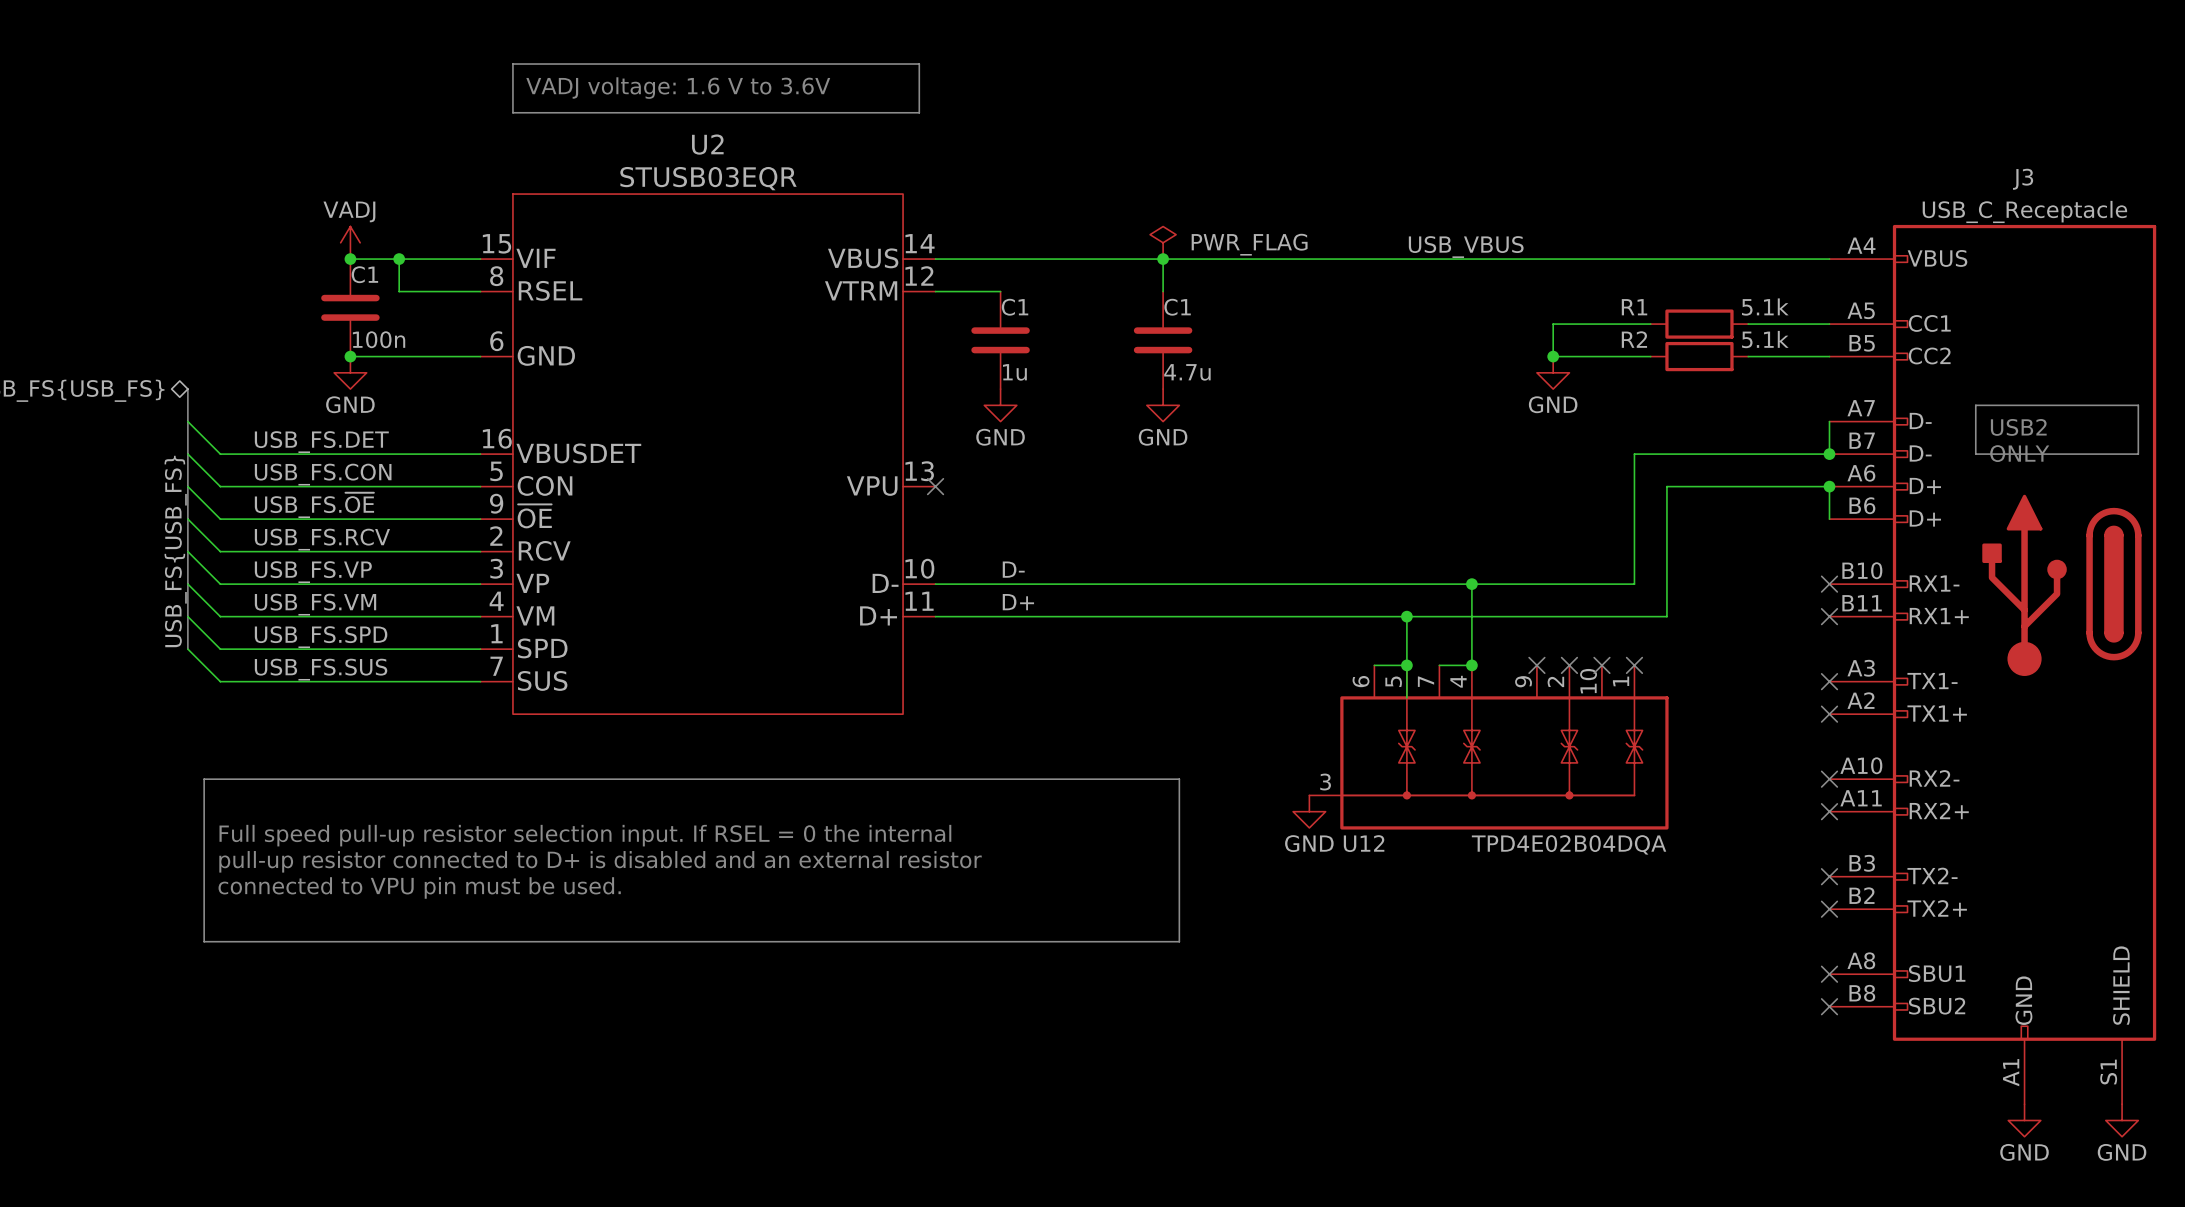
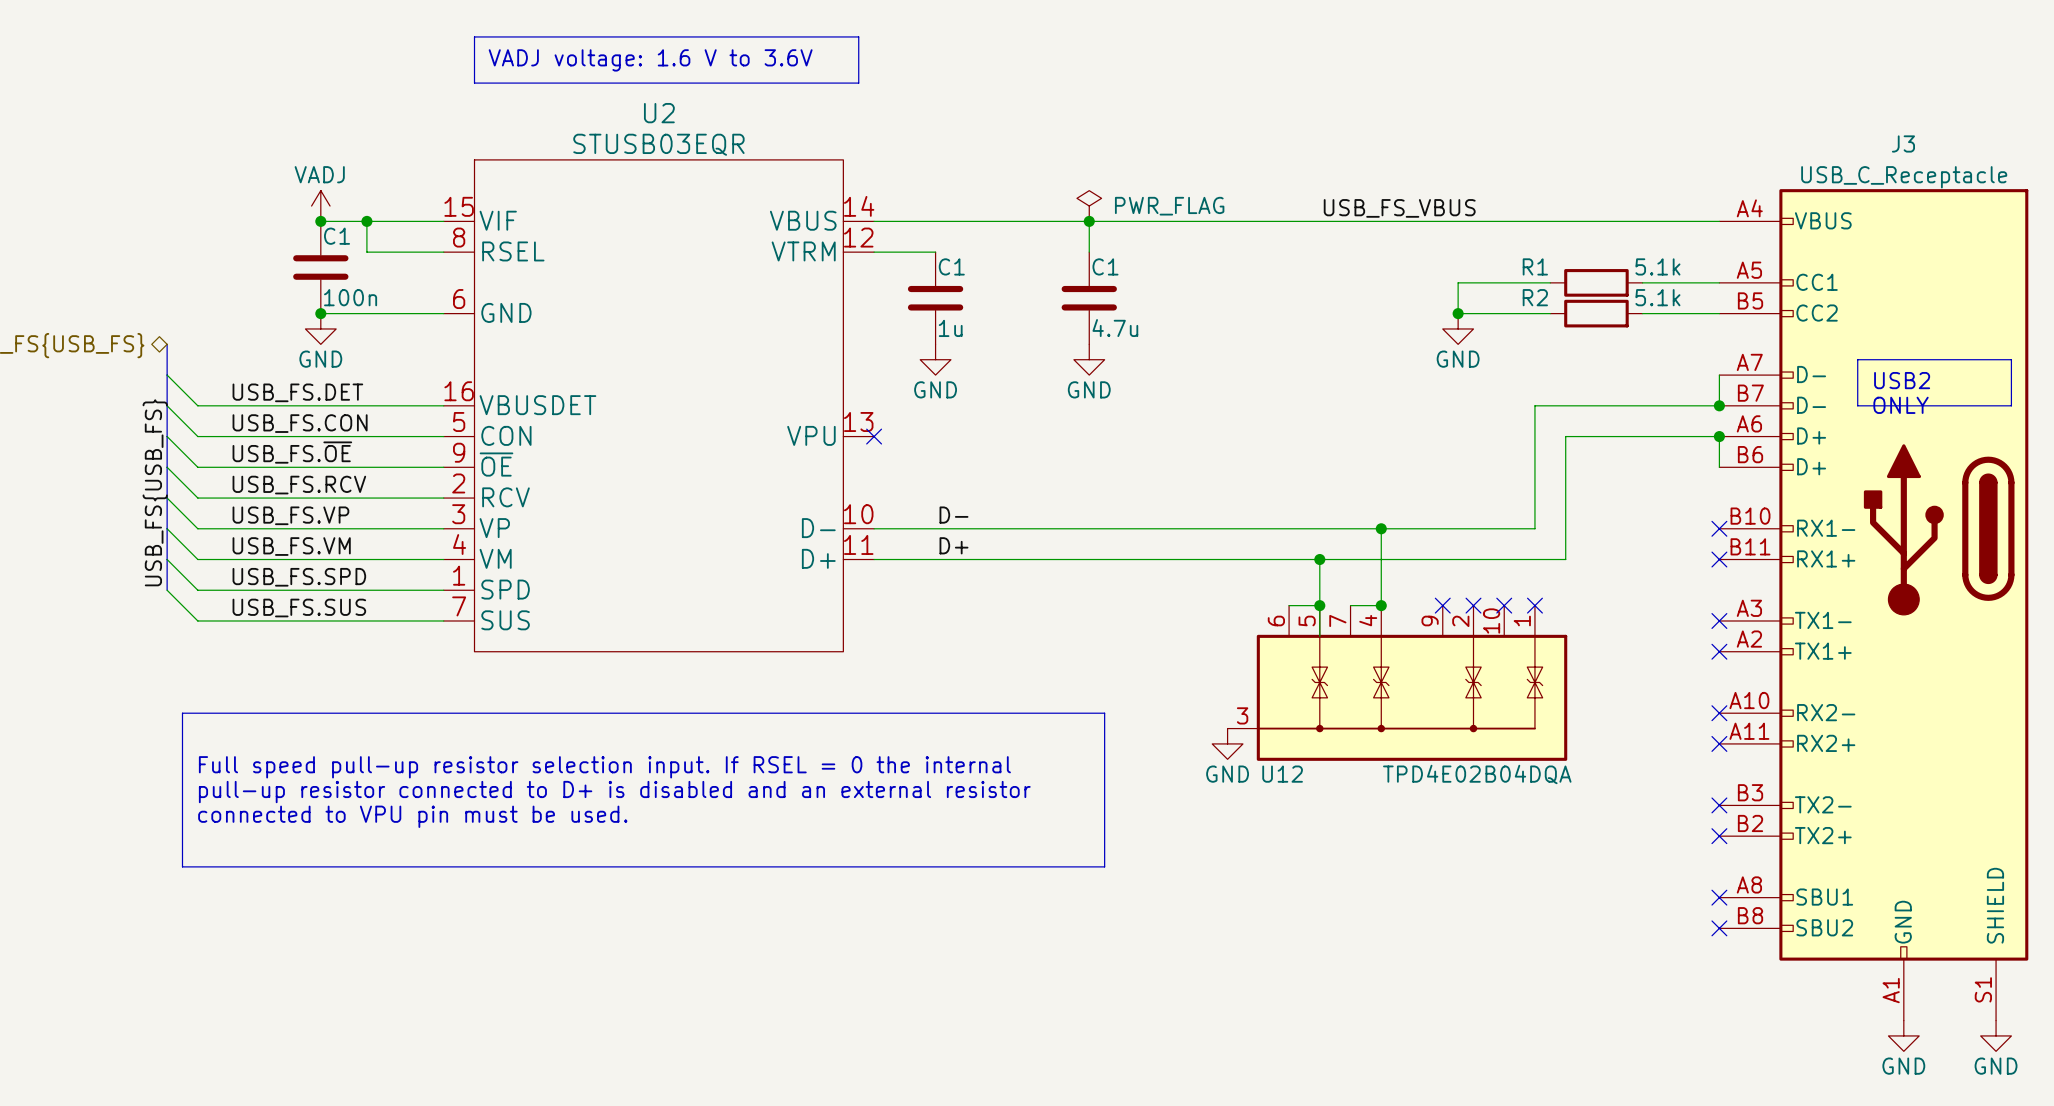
label: USB_VBUS (1466, 247) -> USB_FS_VBUS (1399, 208)

